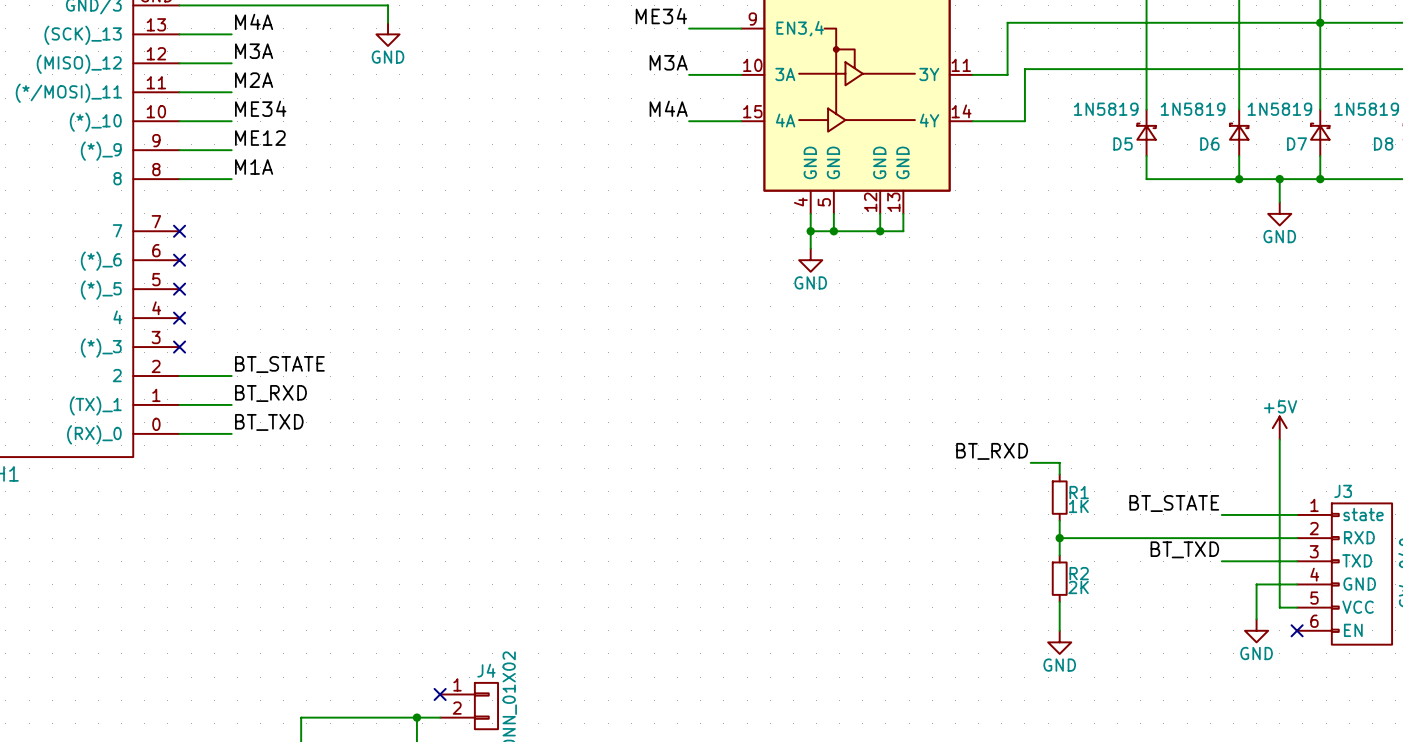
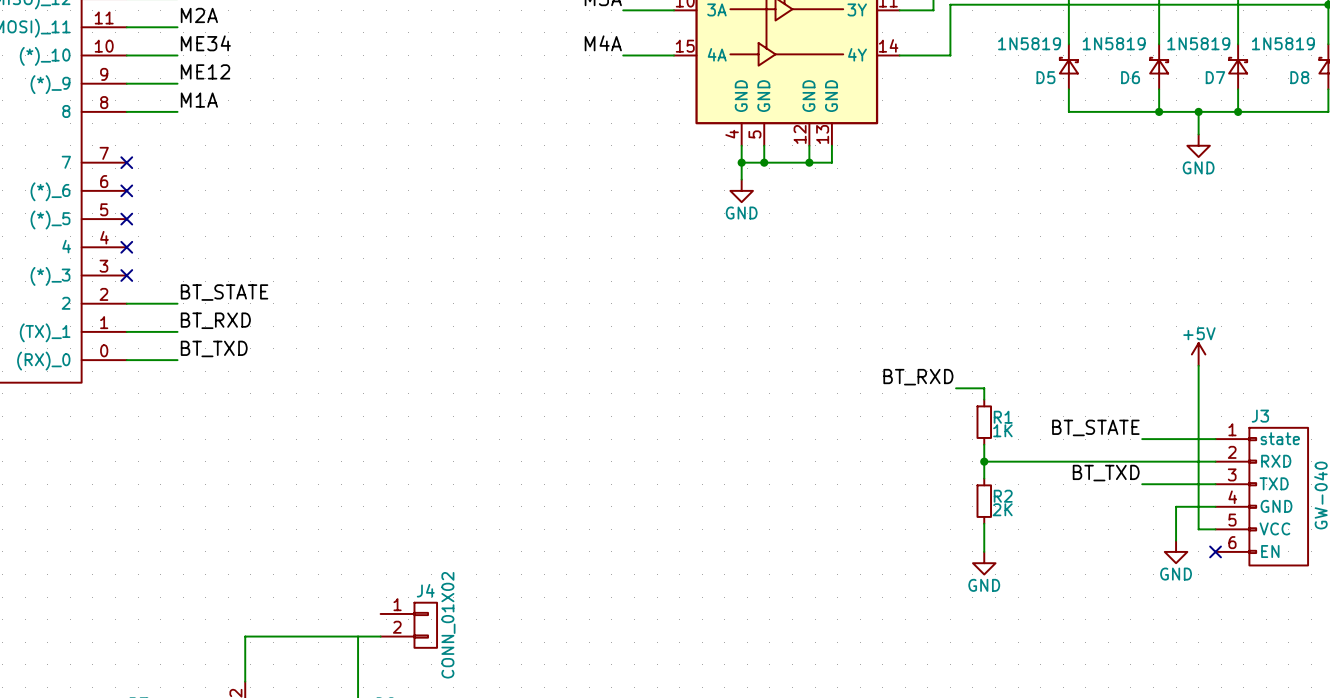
no-connect mark: (440, 694) -> none
junction: (416, 717) -> none

